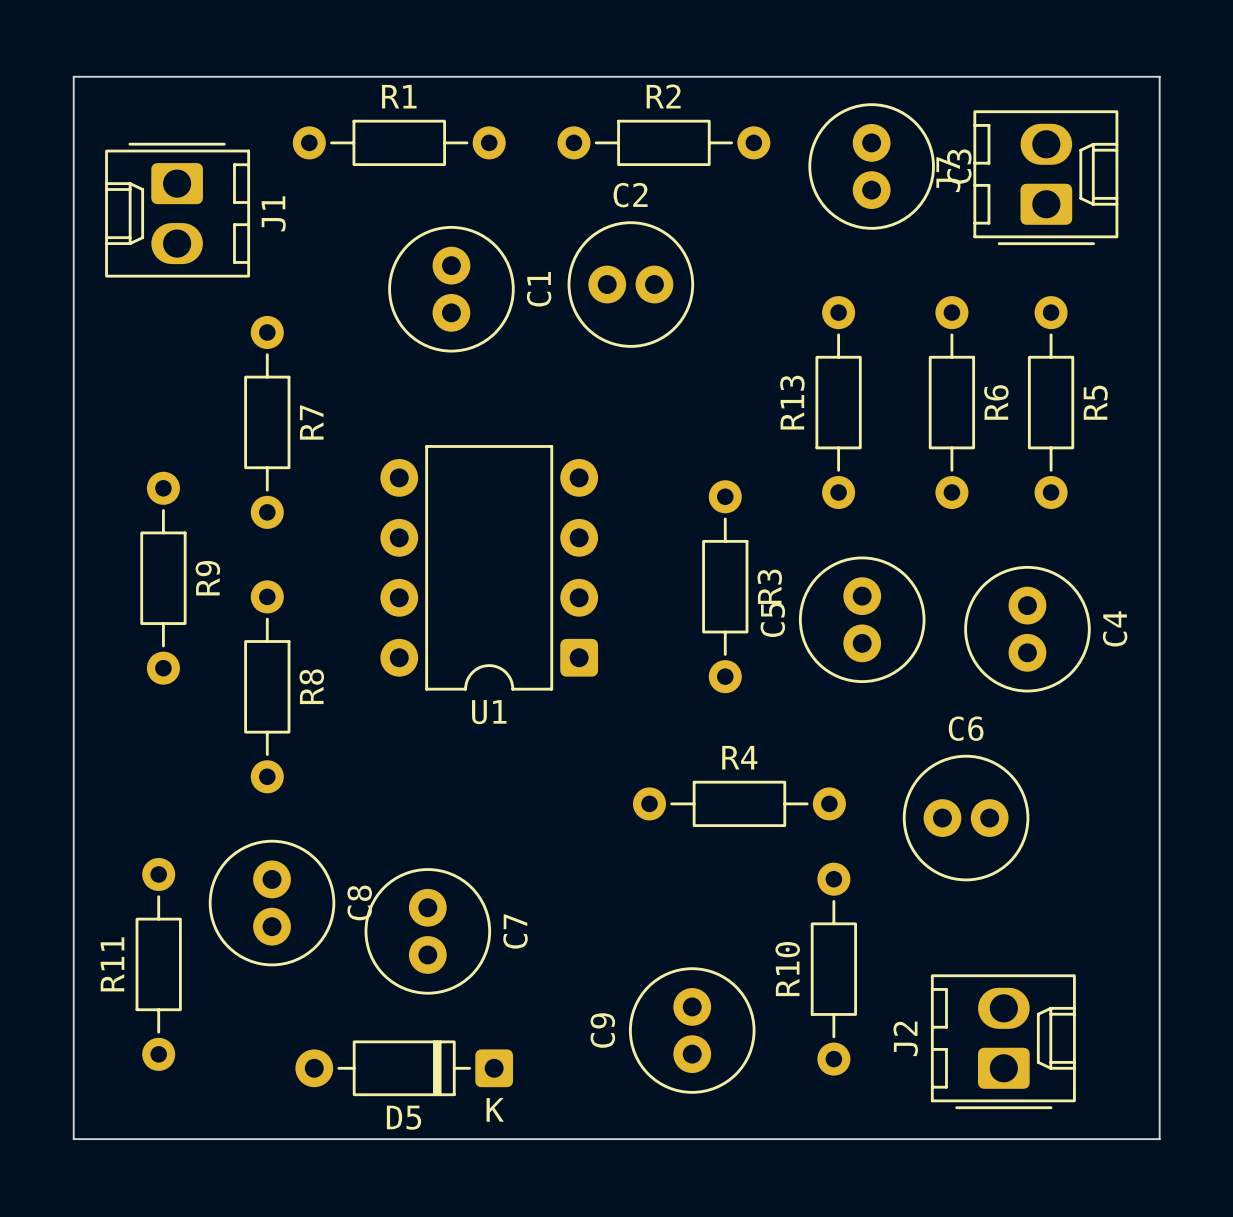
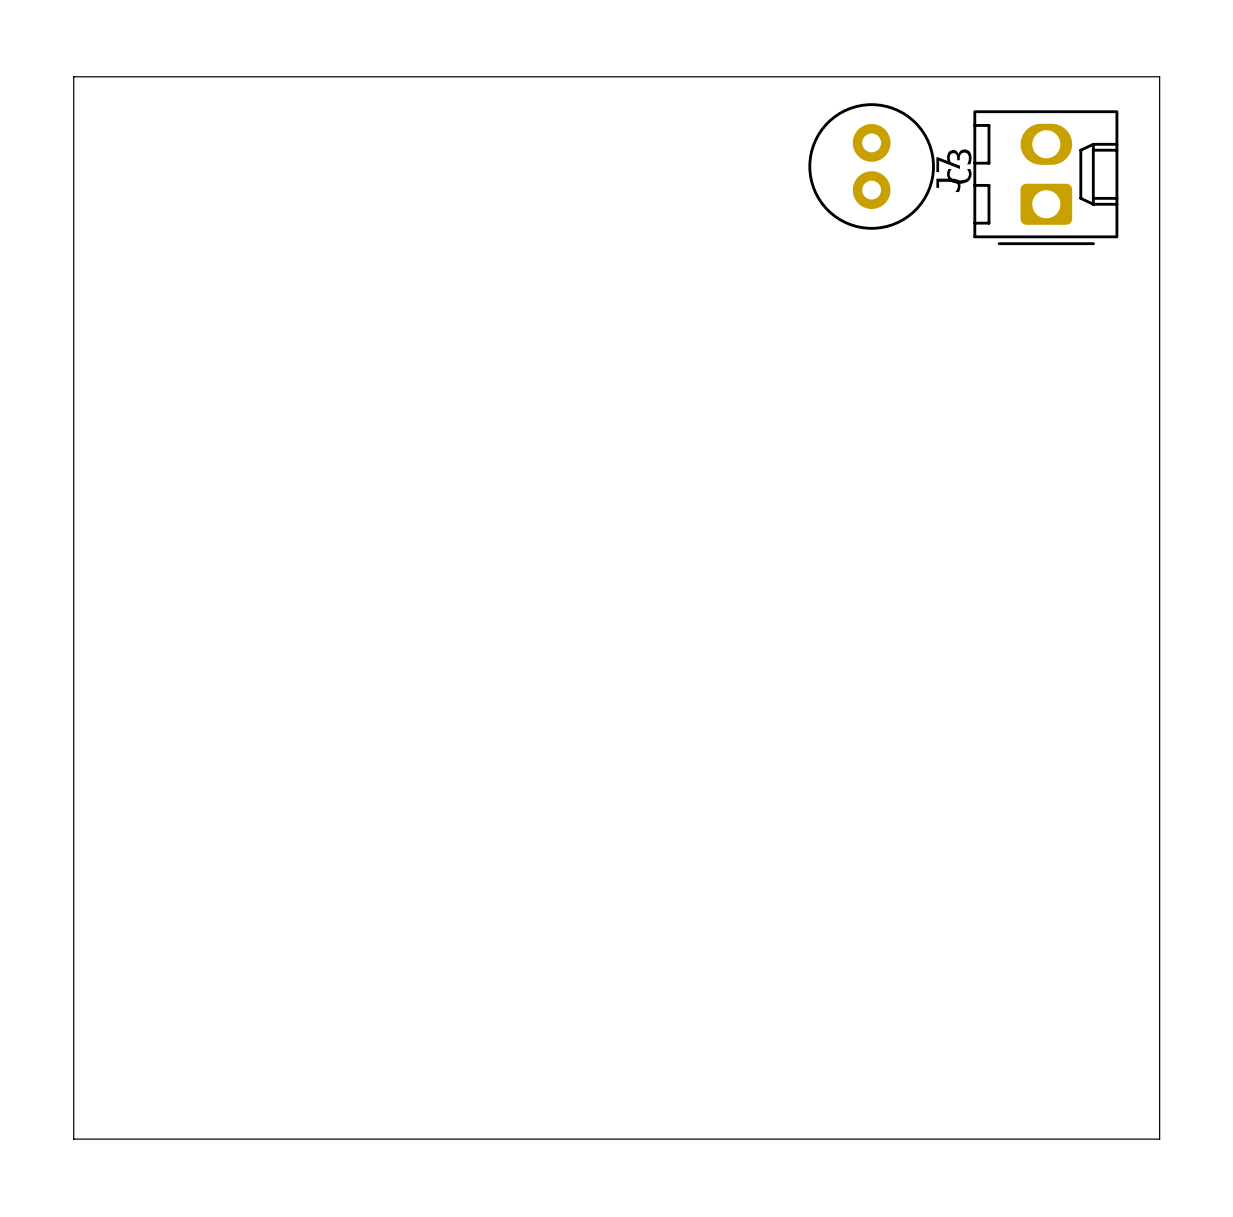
R1: (399, 142) -> none
R2: (663, 142) -> none
J1: (177, 210) -> none
C2: (630, 284) -> none
C1: (451, 289) -> none
R13: (838, 402) -> none
R6: (951, 402) -> none
R5: (1051, 402) -> none
R7: (267, 422) -> none
U1: (489, 567) -> none
R9: (163, 578) -> none
R3: (725, 586) -> none
C5: (862, 619) -> none
C4: (1027, 629) -> none
R8: (267, 686) -> none
R4: (739, 803) -> none
C6: (966, 818) -> none
C8: (272, 903) -> none
C7: (427, 931) -> none
R11: (158, 964) -> none
R10: (833, 969) -> none
C9: (692, 1030) -> none
J2: (1003, 1041) -> none
D5: (404, 1068) -> none

